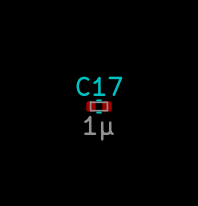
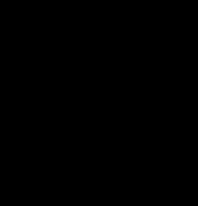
C17: 1µ (99, 106) -> none

